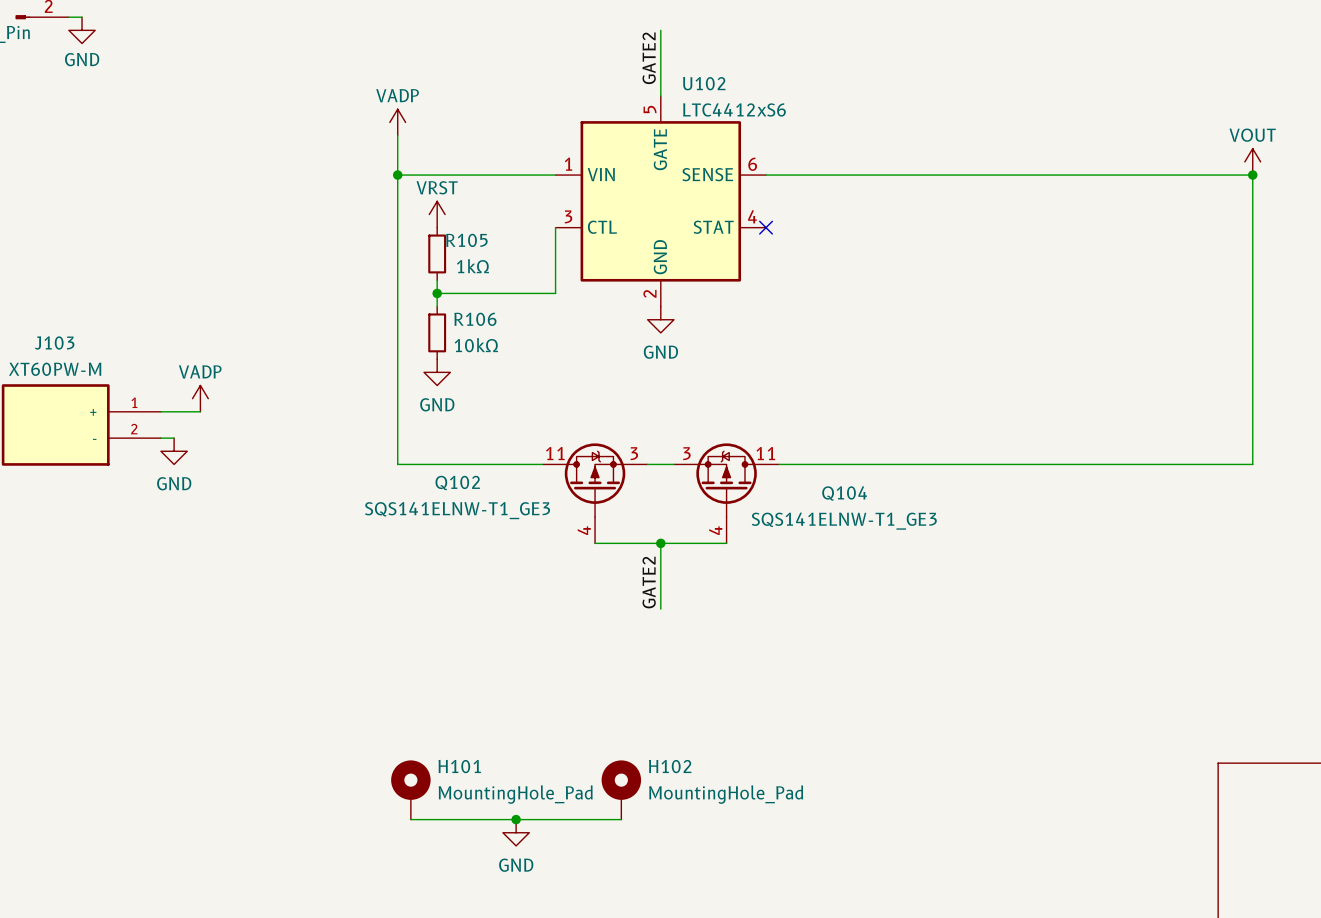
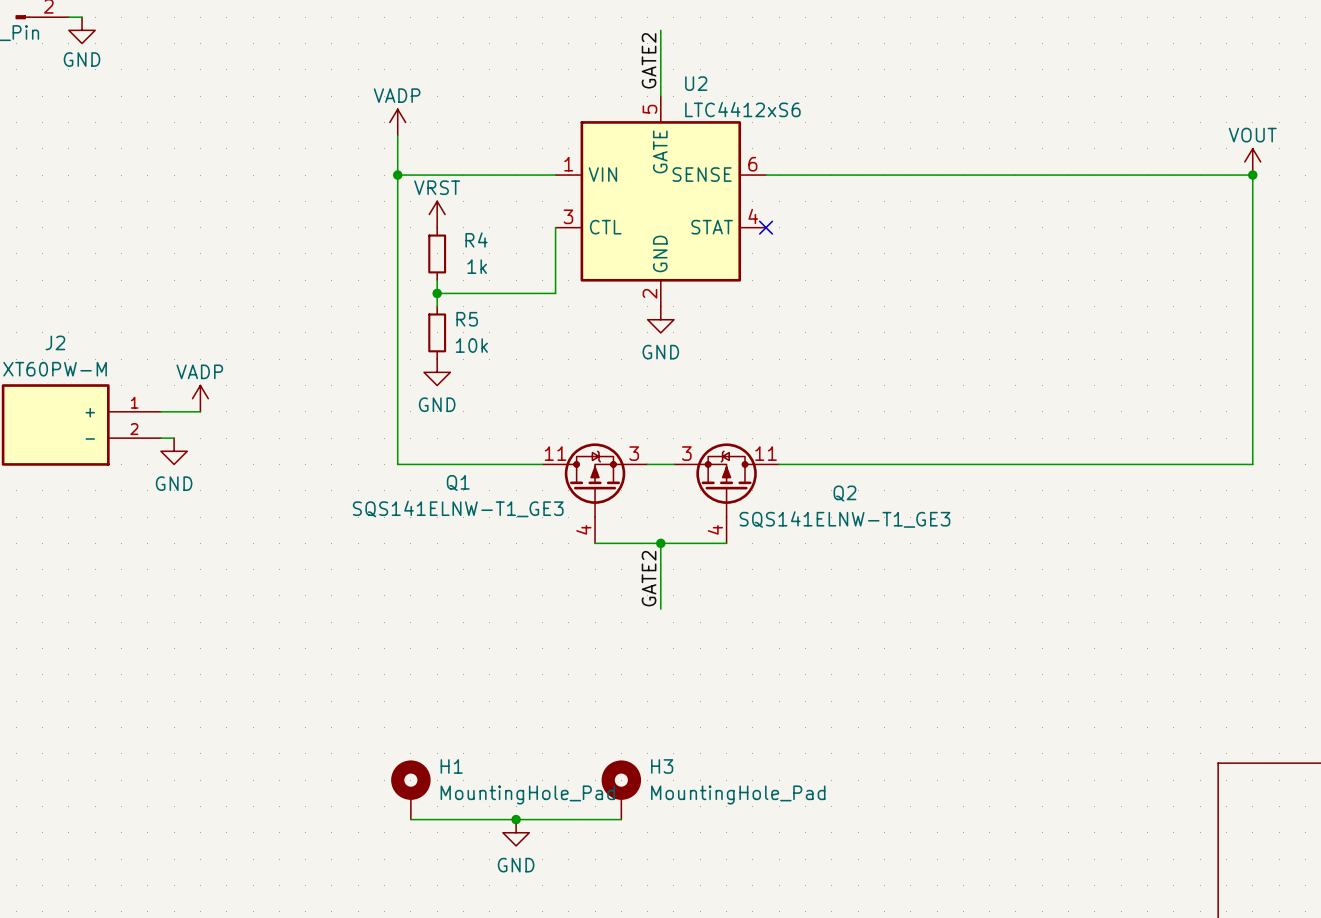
U102 name: U102 (704, 83) -> U2 (696, 83)
R105 name: R105 (466, 240) -> R4 (476, 240)
R105 value: 1kΩ (472, 266) -> 1k (477, 266)
R106 name: R106 (475, 319) -> R5 (467, 319)
J103 name: J103 (54, 343) -> J2 (55, 342)
R106 value: 10kΩ (476, 345) -> 10k (471, 345)
Q102 name: Q102 (457, 482) -> Q1 (458, 482)
Q104 name: Q104 (844, 493) -> Q2 (844, 493)
H101 name: H101 (459, 766) -> H1 (451, 766)
H102 name: H102 (670, 766) -> H3 (662, 766)

